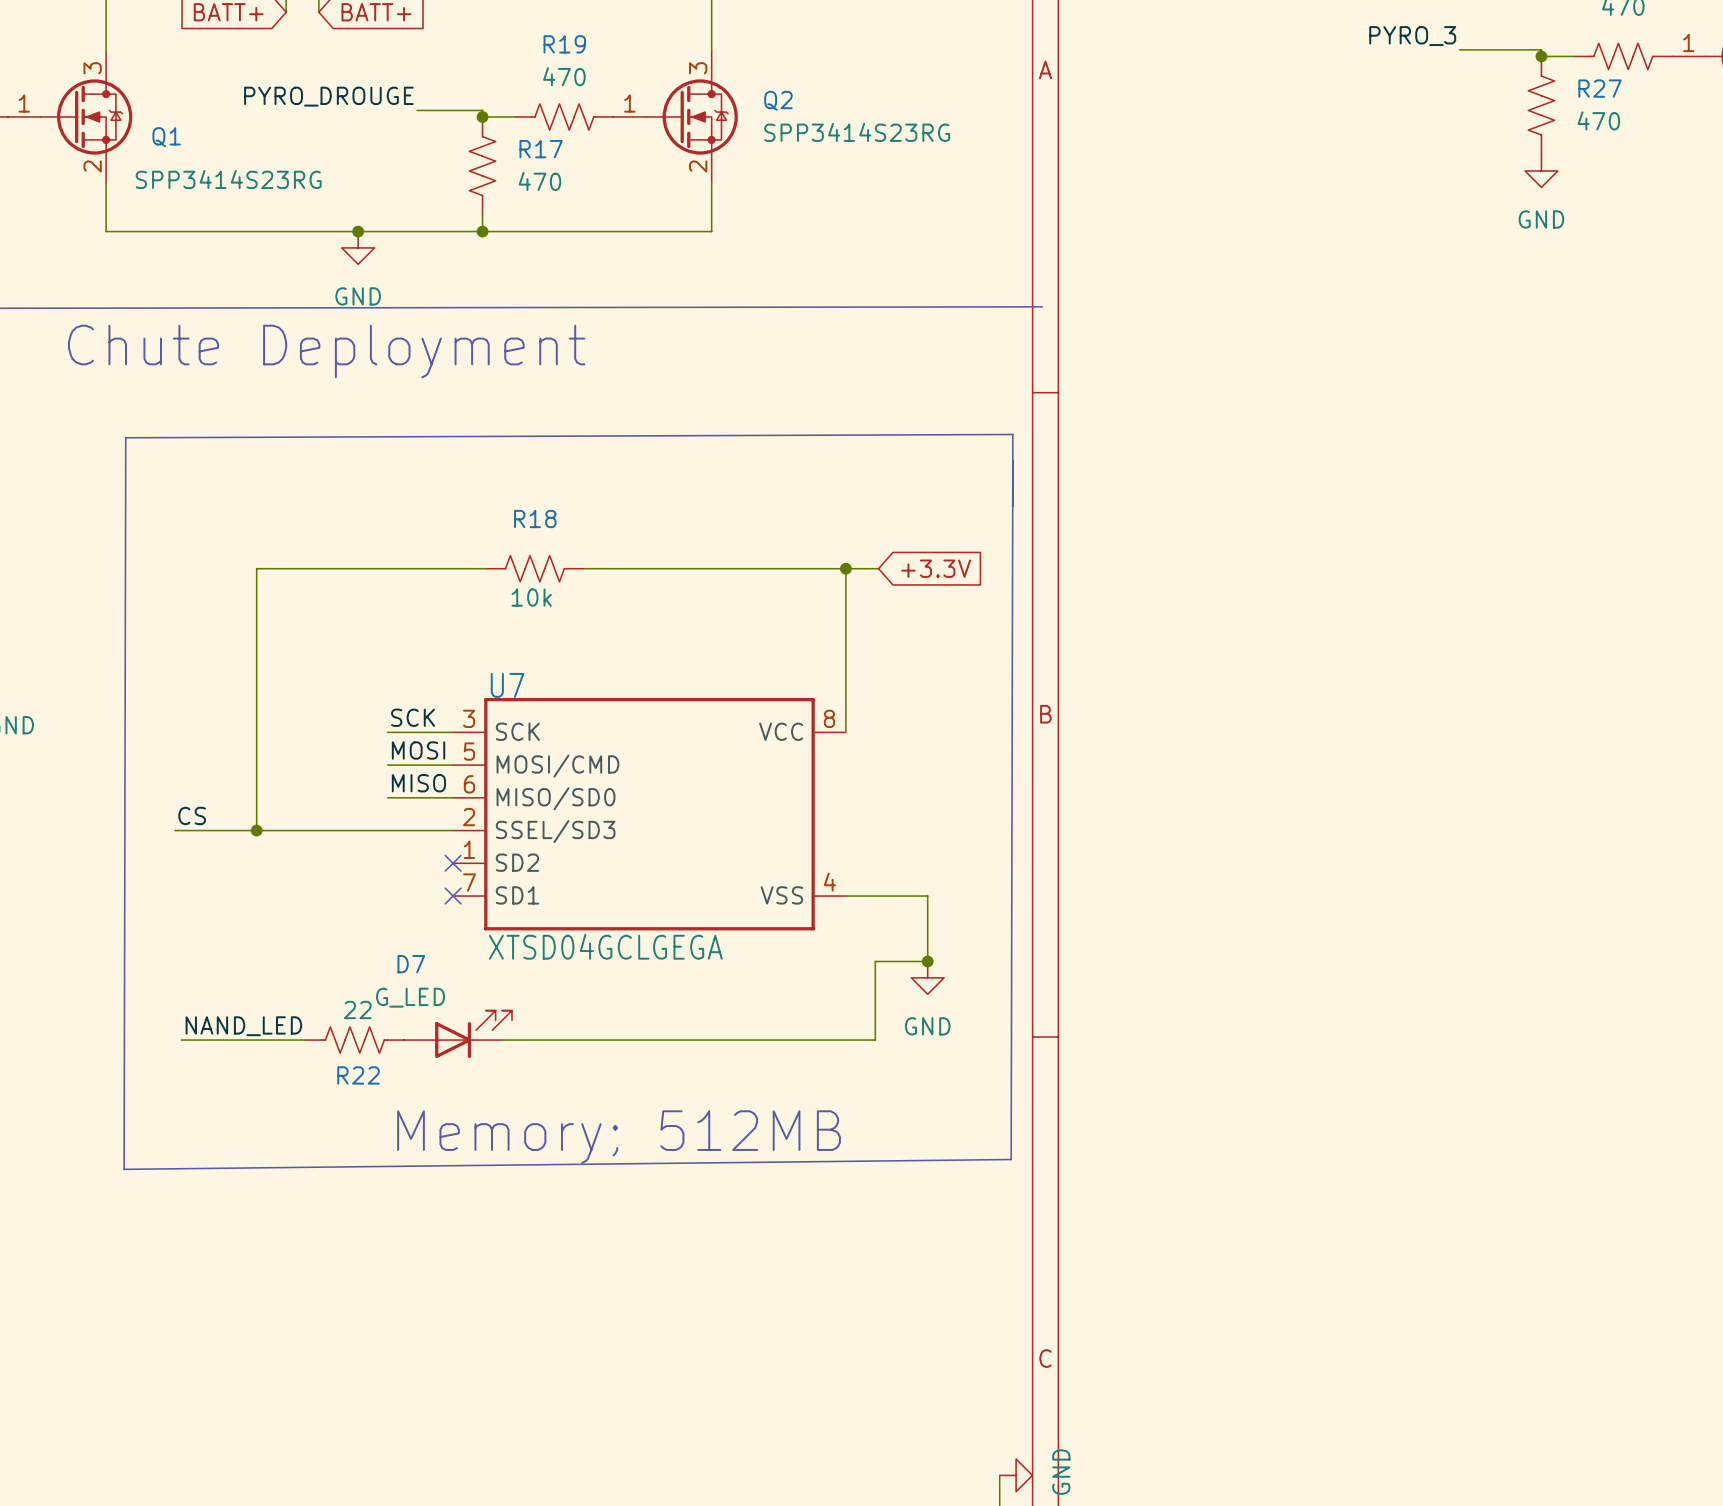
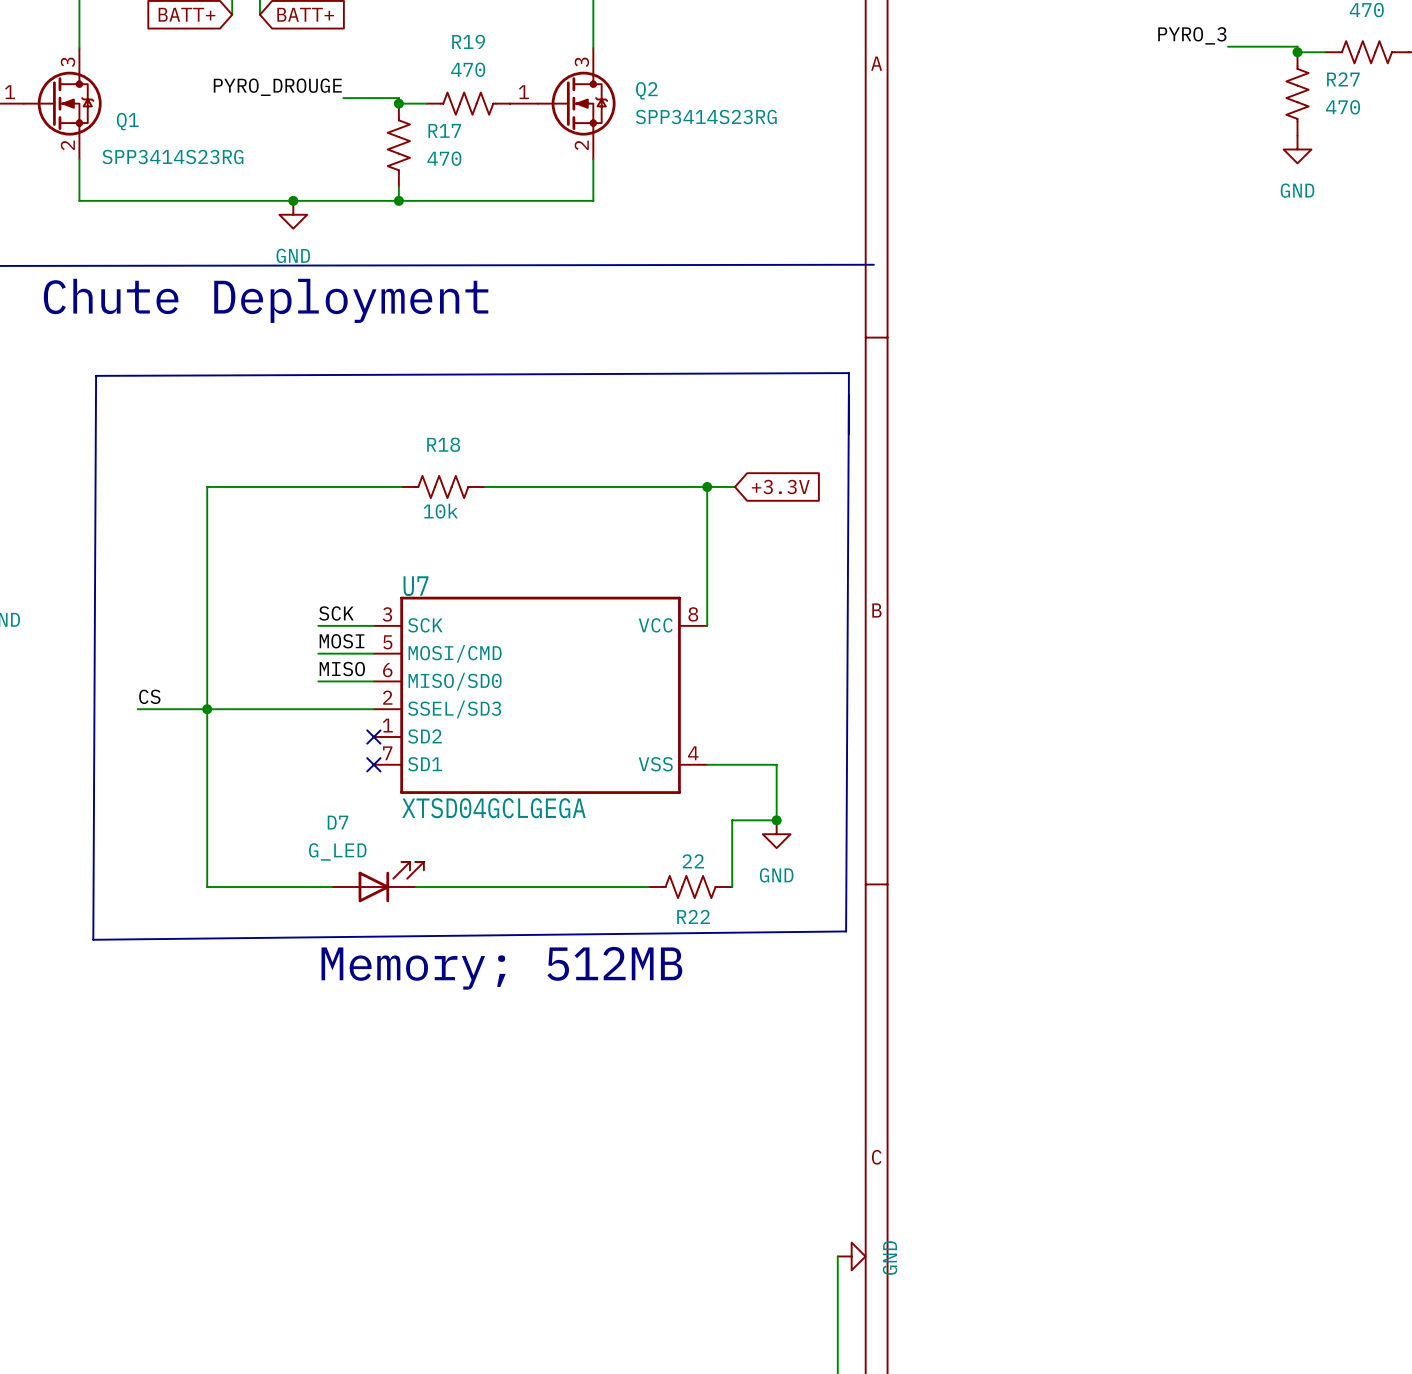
line: (125, 437) (124, 1169) (1011, 1159) (1012, 460) -> (96, 375) (93, 939) (846, 931) (848, 395)
label: NAND_LED (243, 1026) -> none
wire: (181, 1040) (256, 1040) -> (207, 709) (207, 887)
R22 position: (354, 1040) -> (690, 887)

